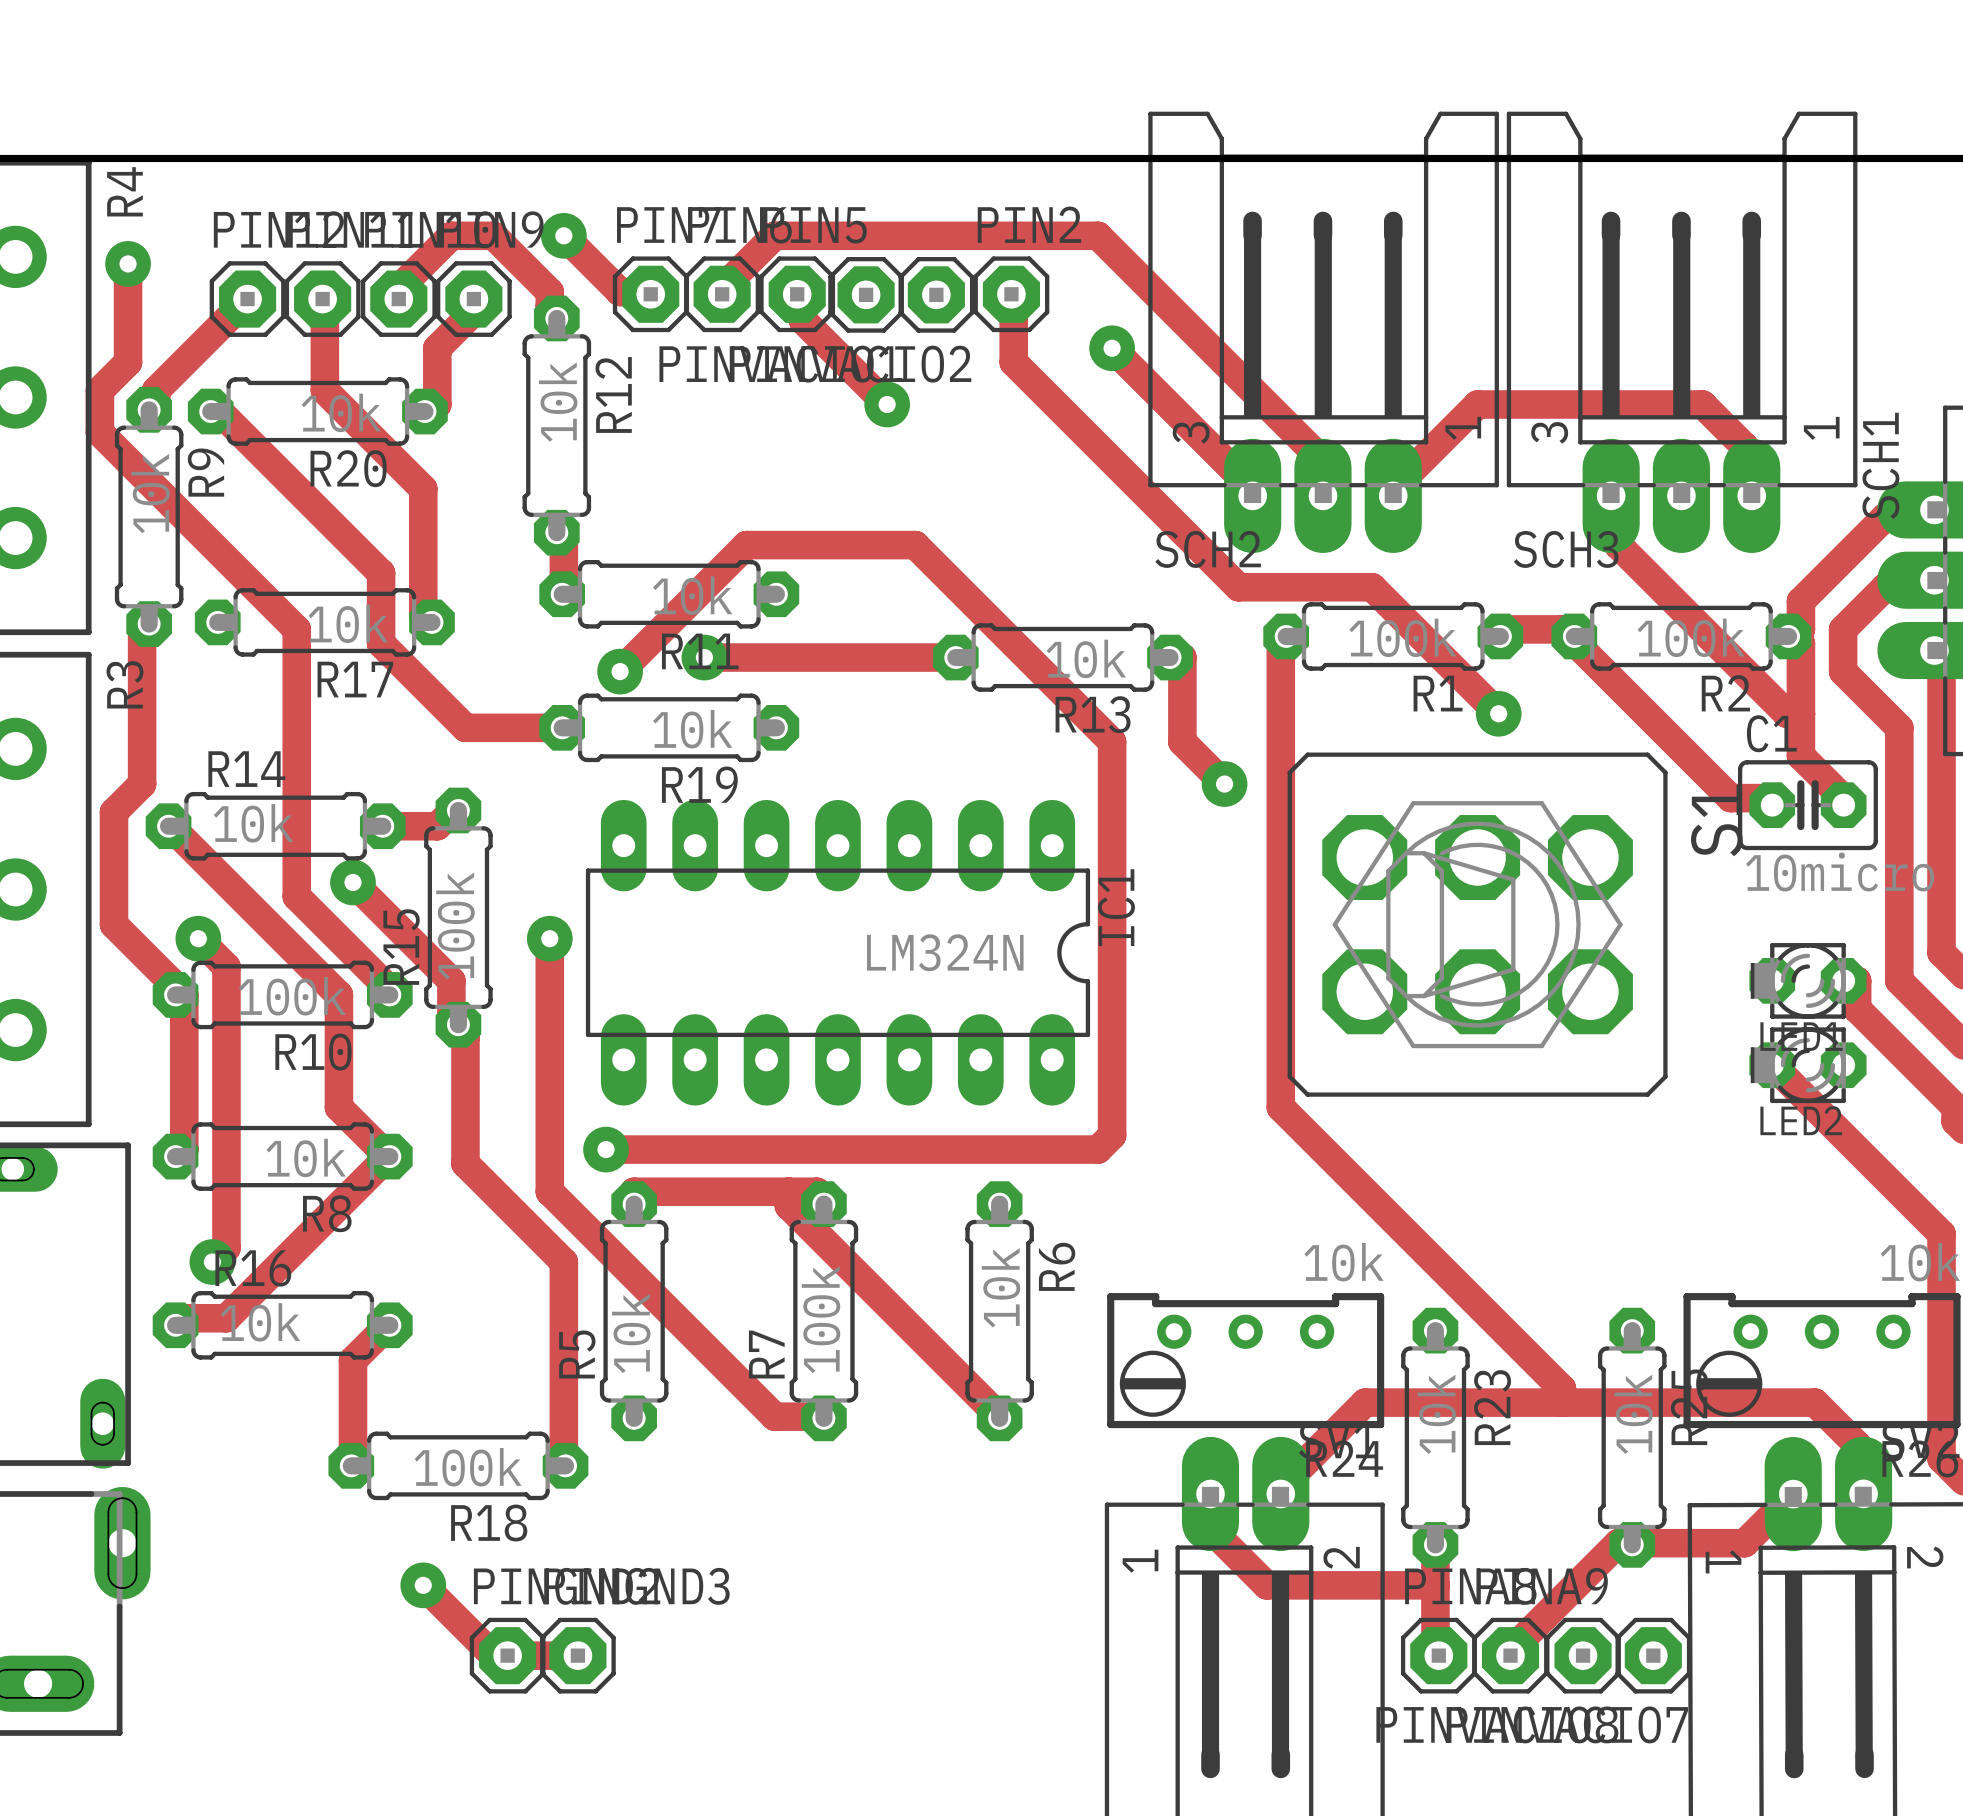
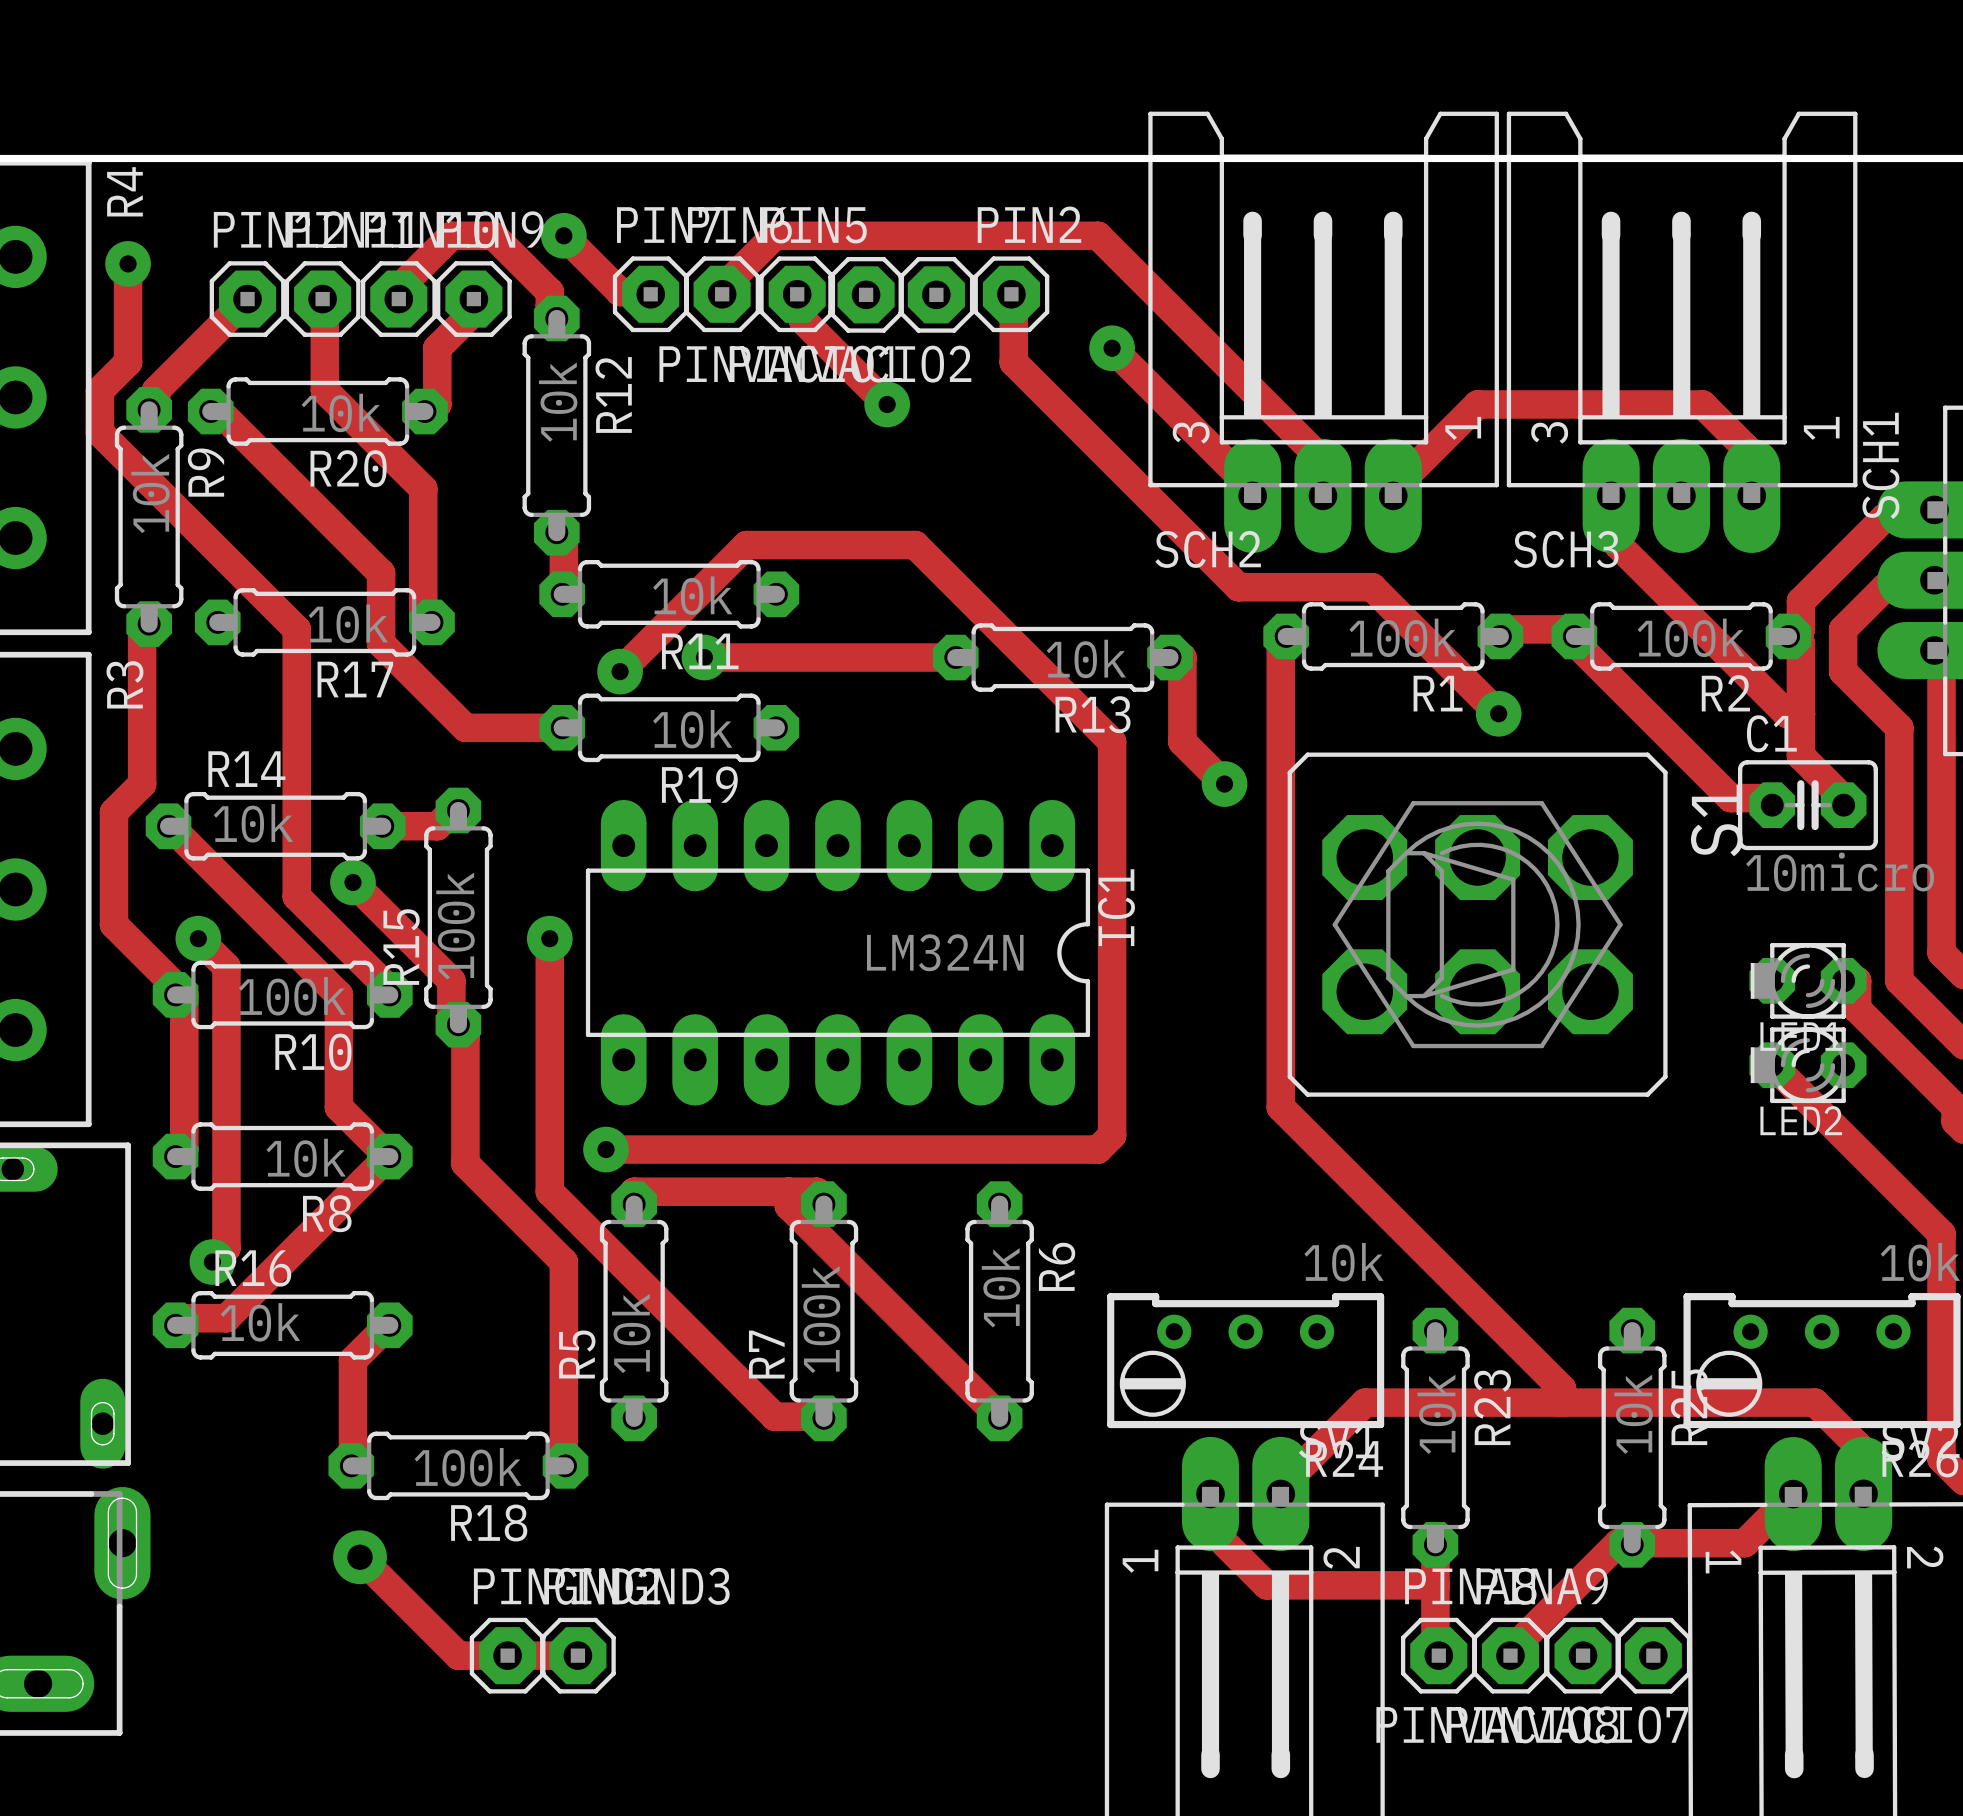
via: none -> (360, 1557)
track: (423, 1585) (493, 1655) -> (360, 1557) (458, 1655) (493, 1655)
via: (423, 1585) -> none

